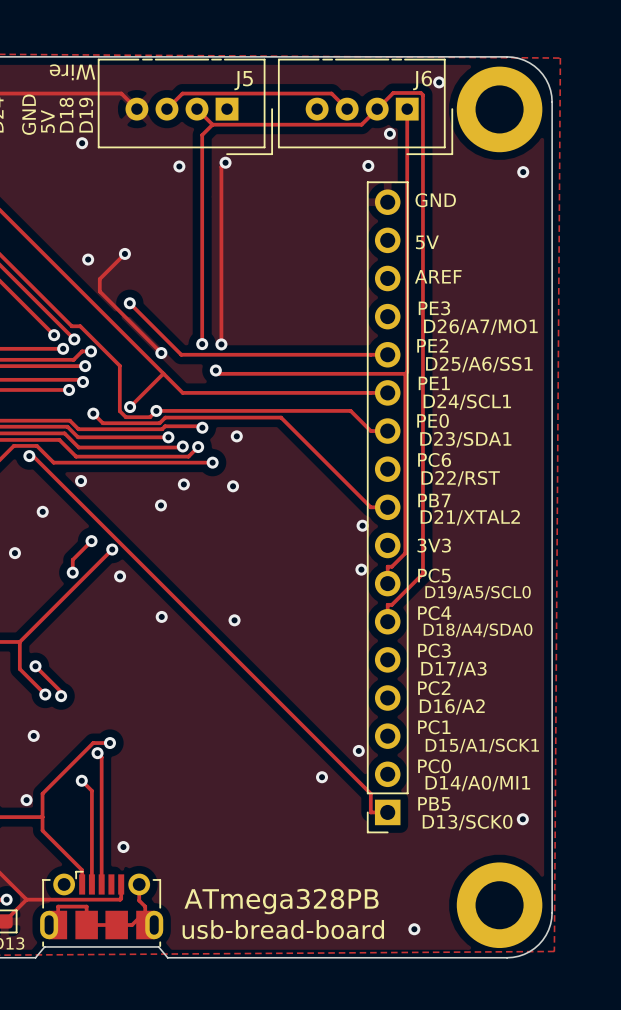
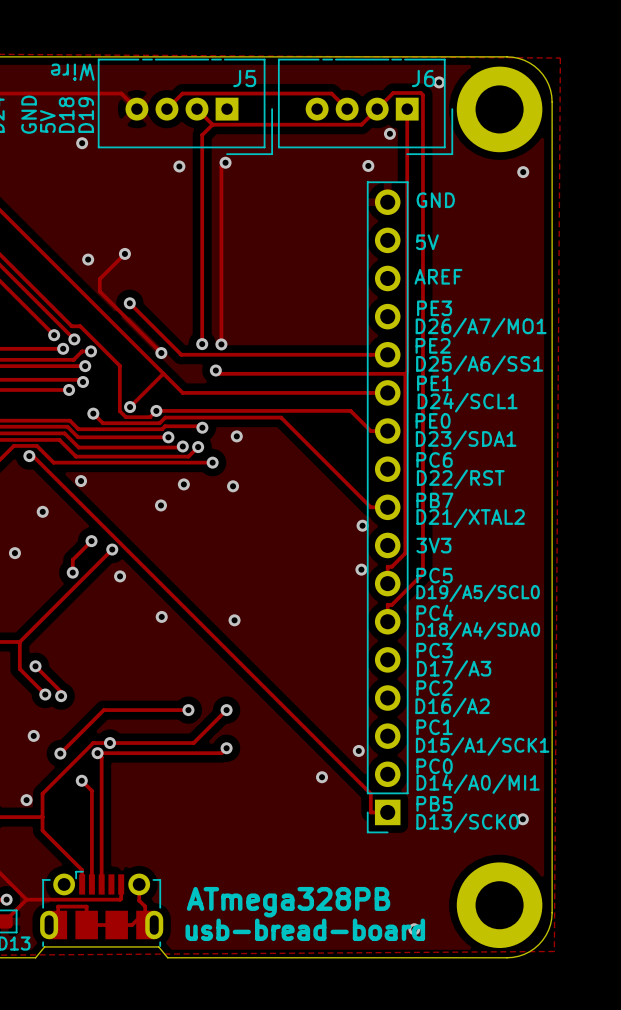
track: none -> (188, 710) (103, 710) (60, 753)
via: none -> (188, 710)
track: none -> (226, 710) (193, 743) (109, 743)
via: none -> (226, 710)
track: none -> (226, 748) (221, 753) (97, 753)
via: none -> (226, 748)
via: none -> (60, 753)
via: (123, 847) -> none

